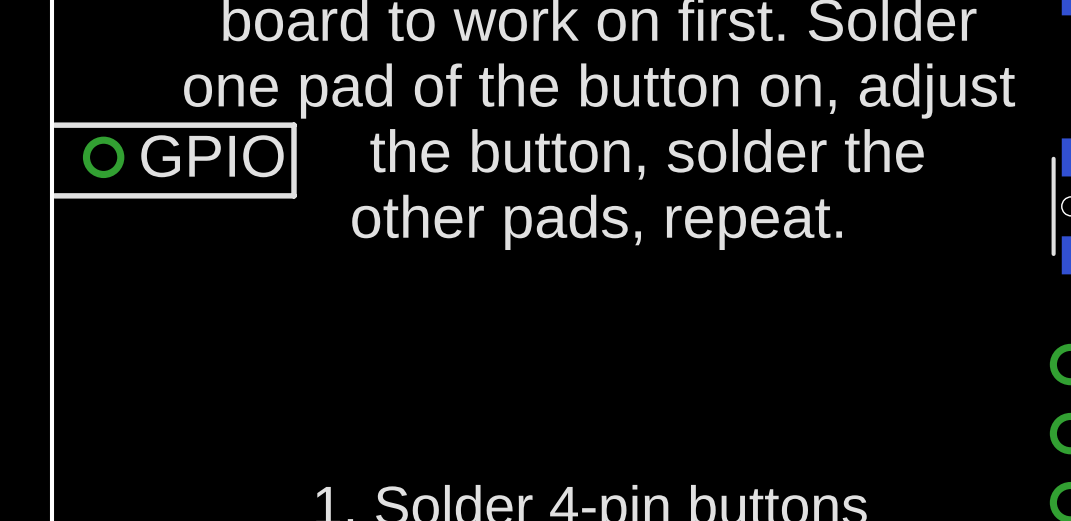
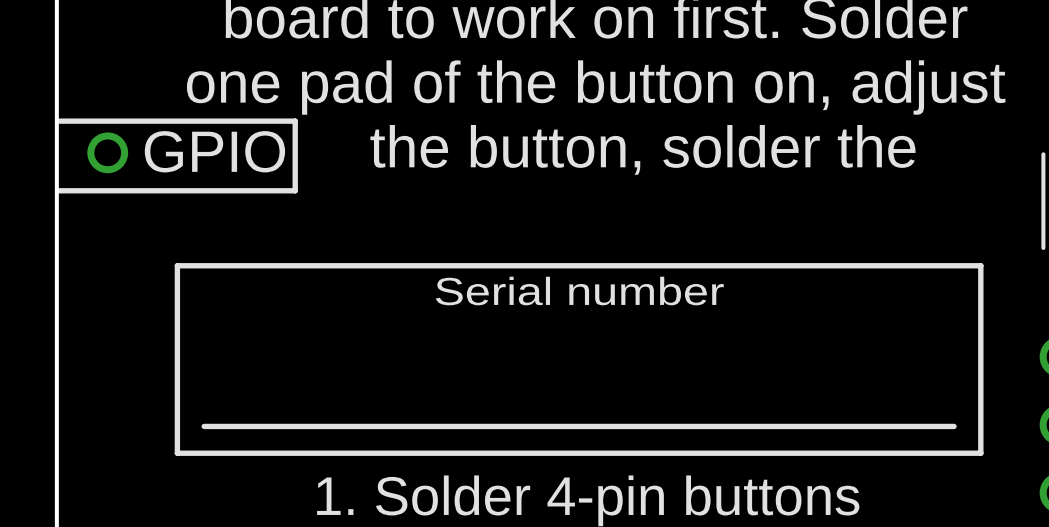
text: other pads, repeat. (597, 222) -> none
line: none -> (980, 265) (980, 453) (177, 453) (177, 265) (980, 265)
text: none -> Serial number (579, 291)
line: none -> (954, 426) (204, 426)

